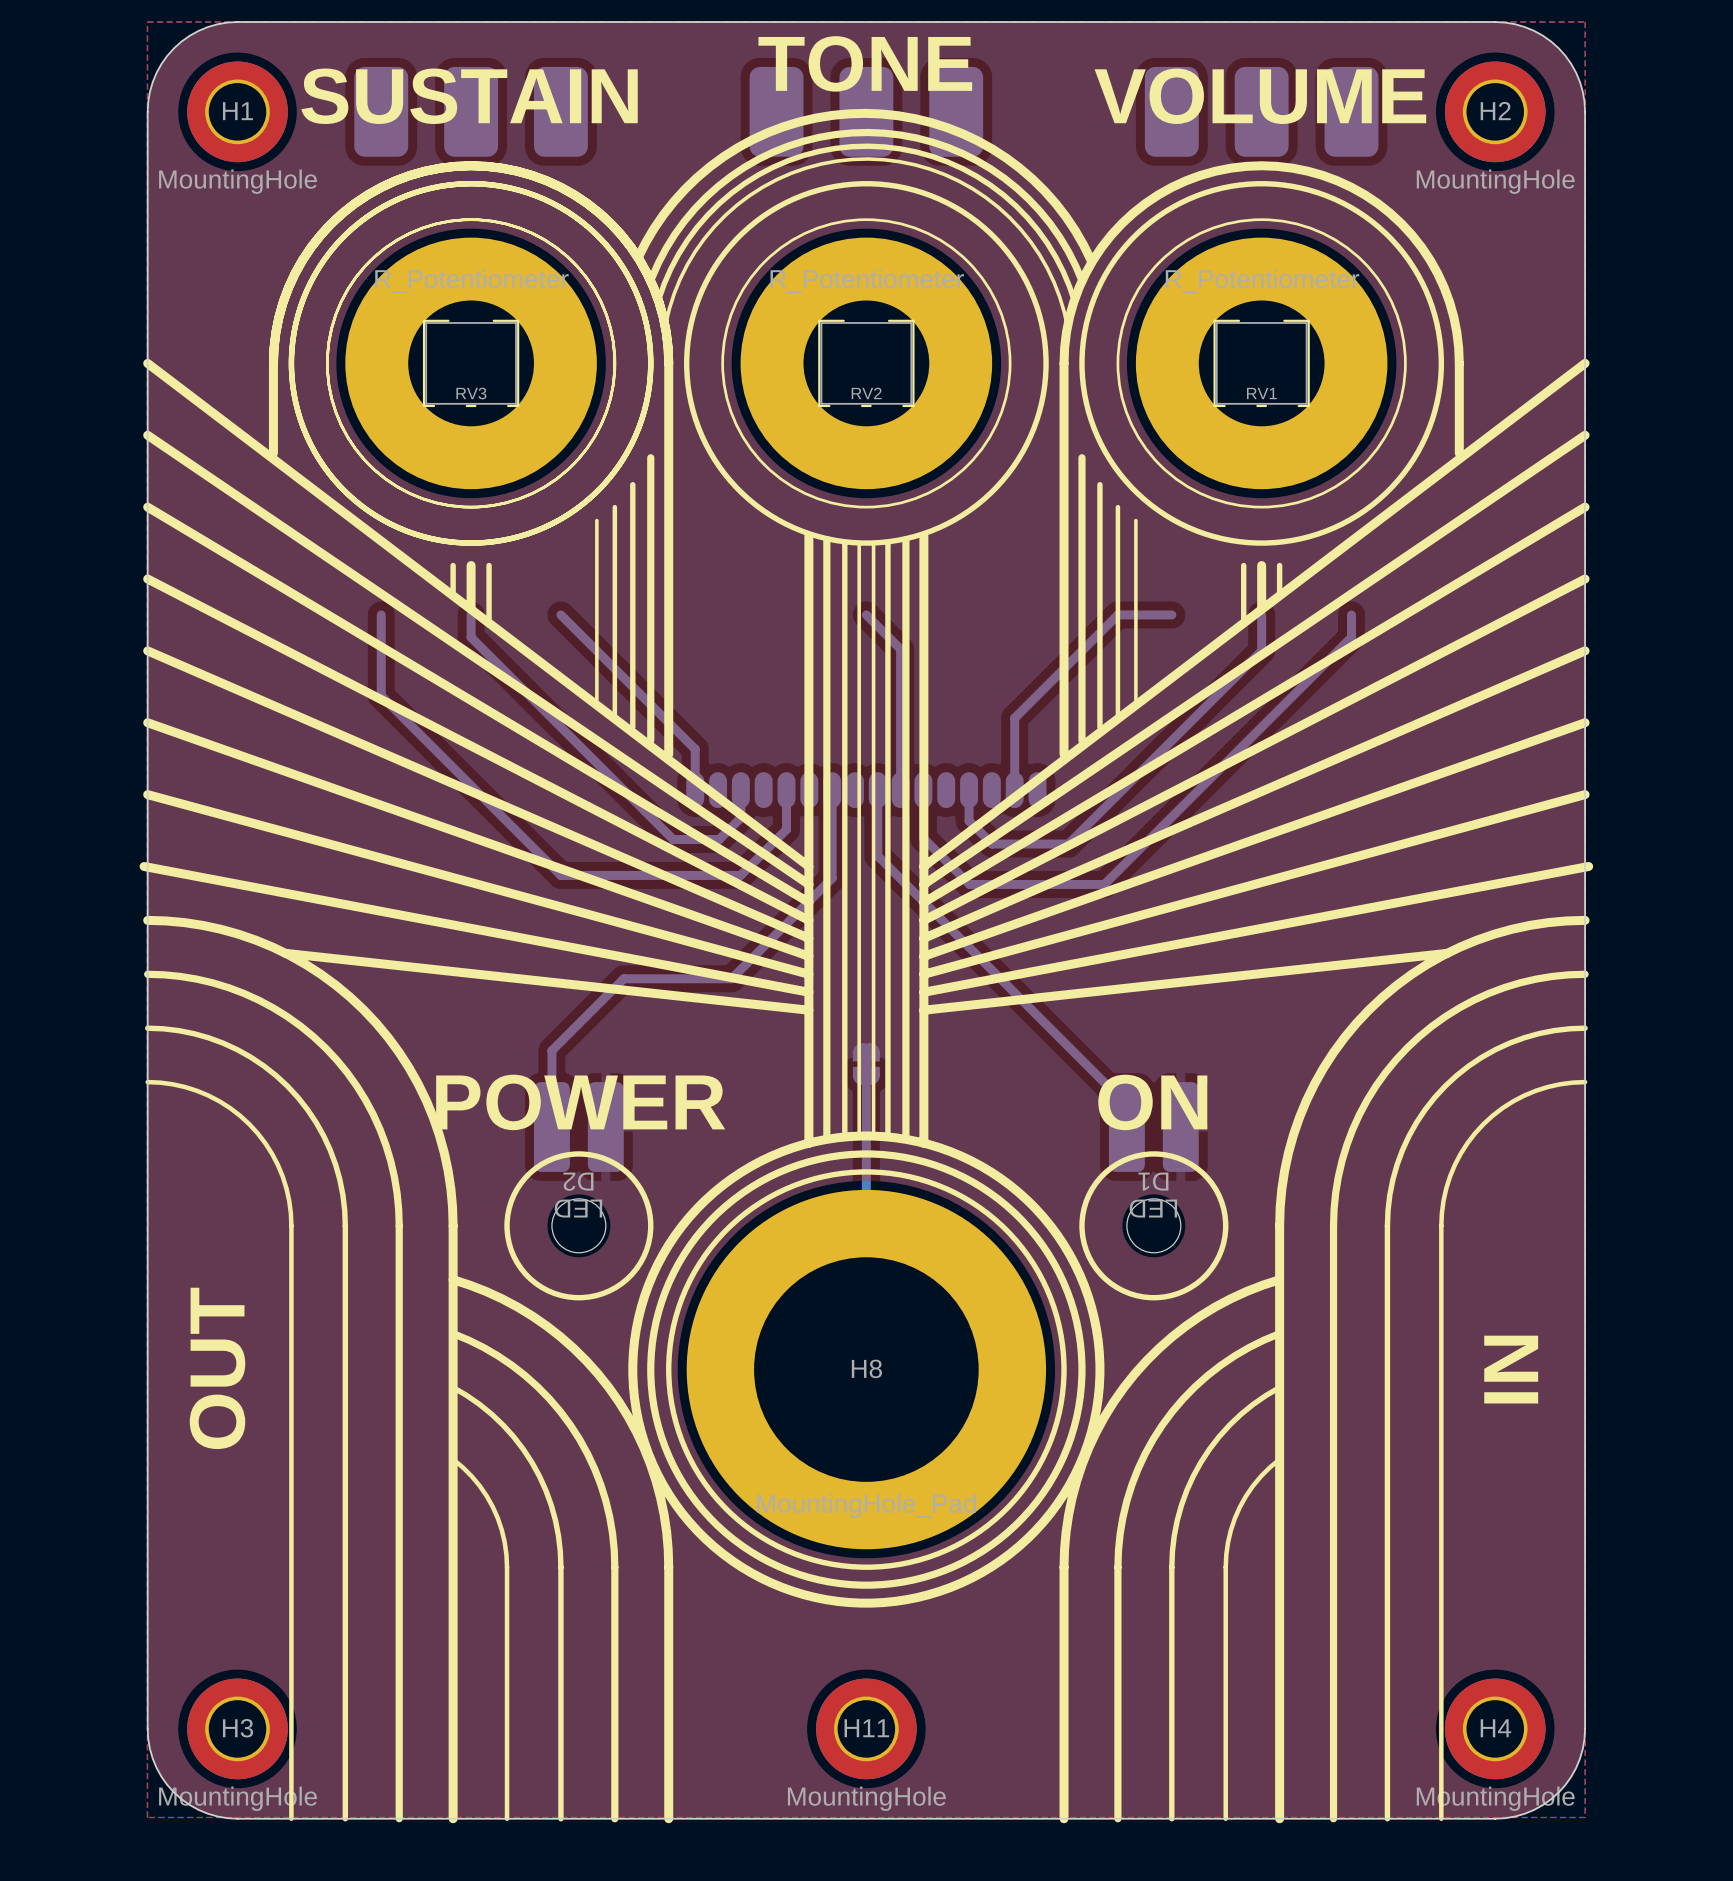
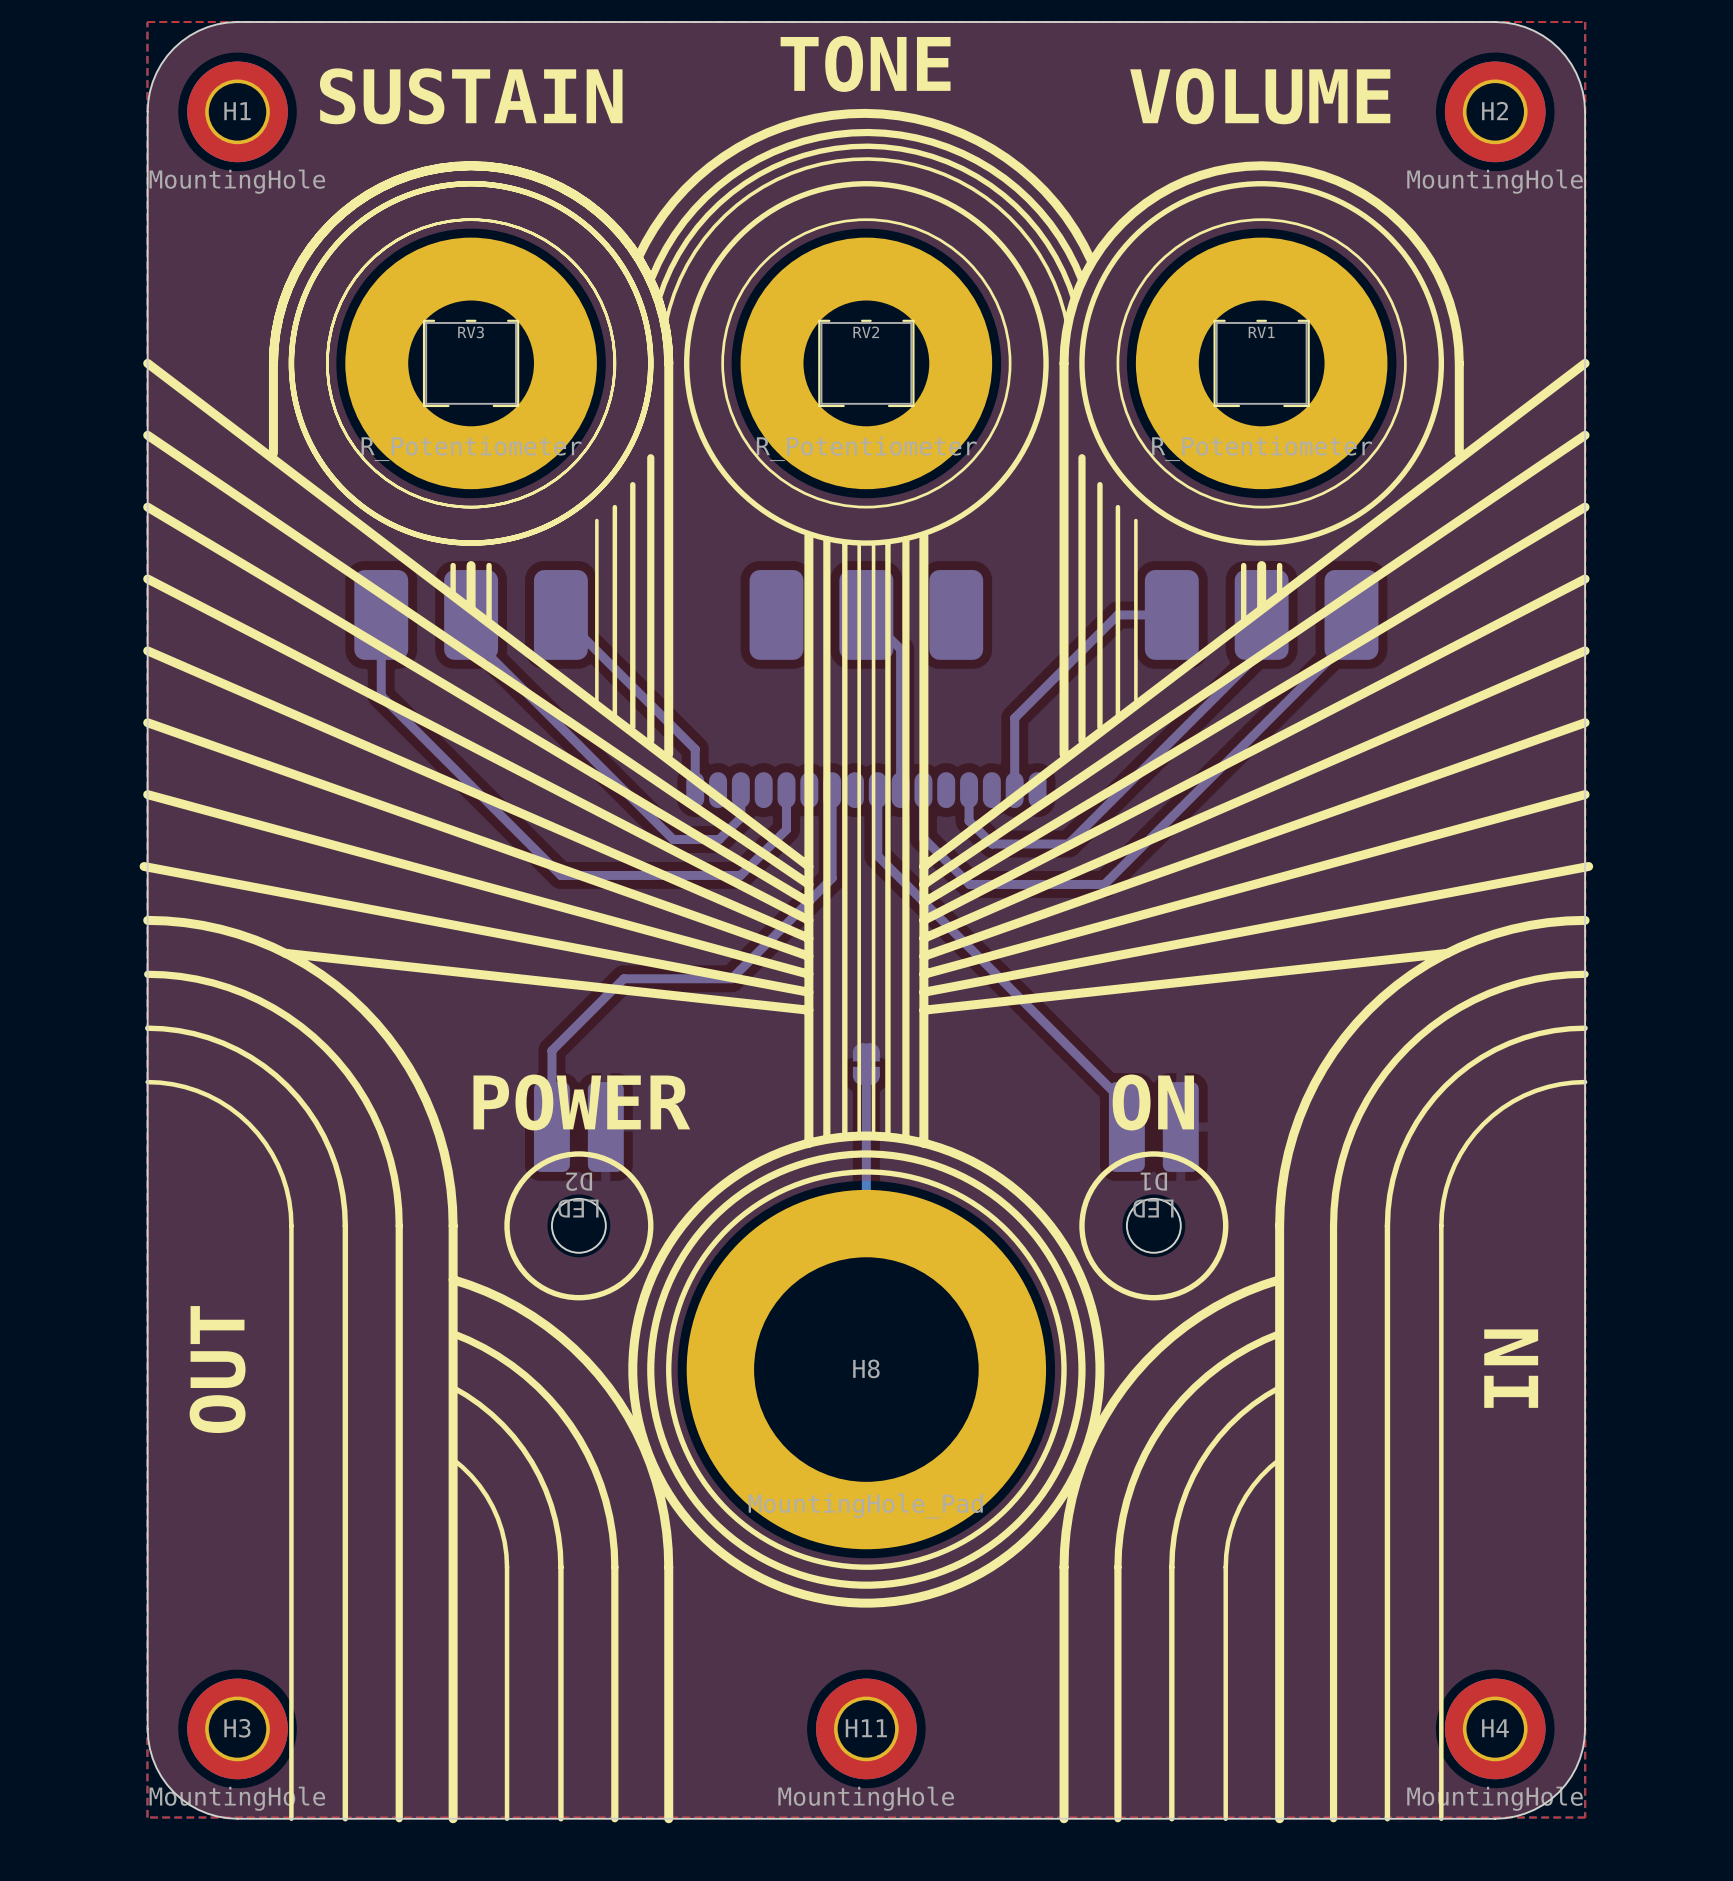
RV3 rotation: 0° (471, 278) -> 180° (471, 448)
RV2 rotation: 0° (866, 278) -> 180° (866, 448)
RV1 rotation: 0° (1261, 278) -> 180° (1261, 448)

